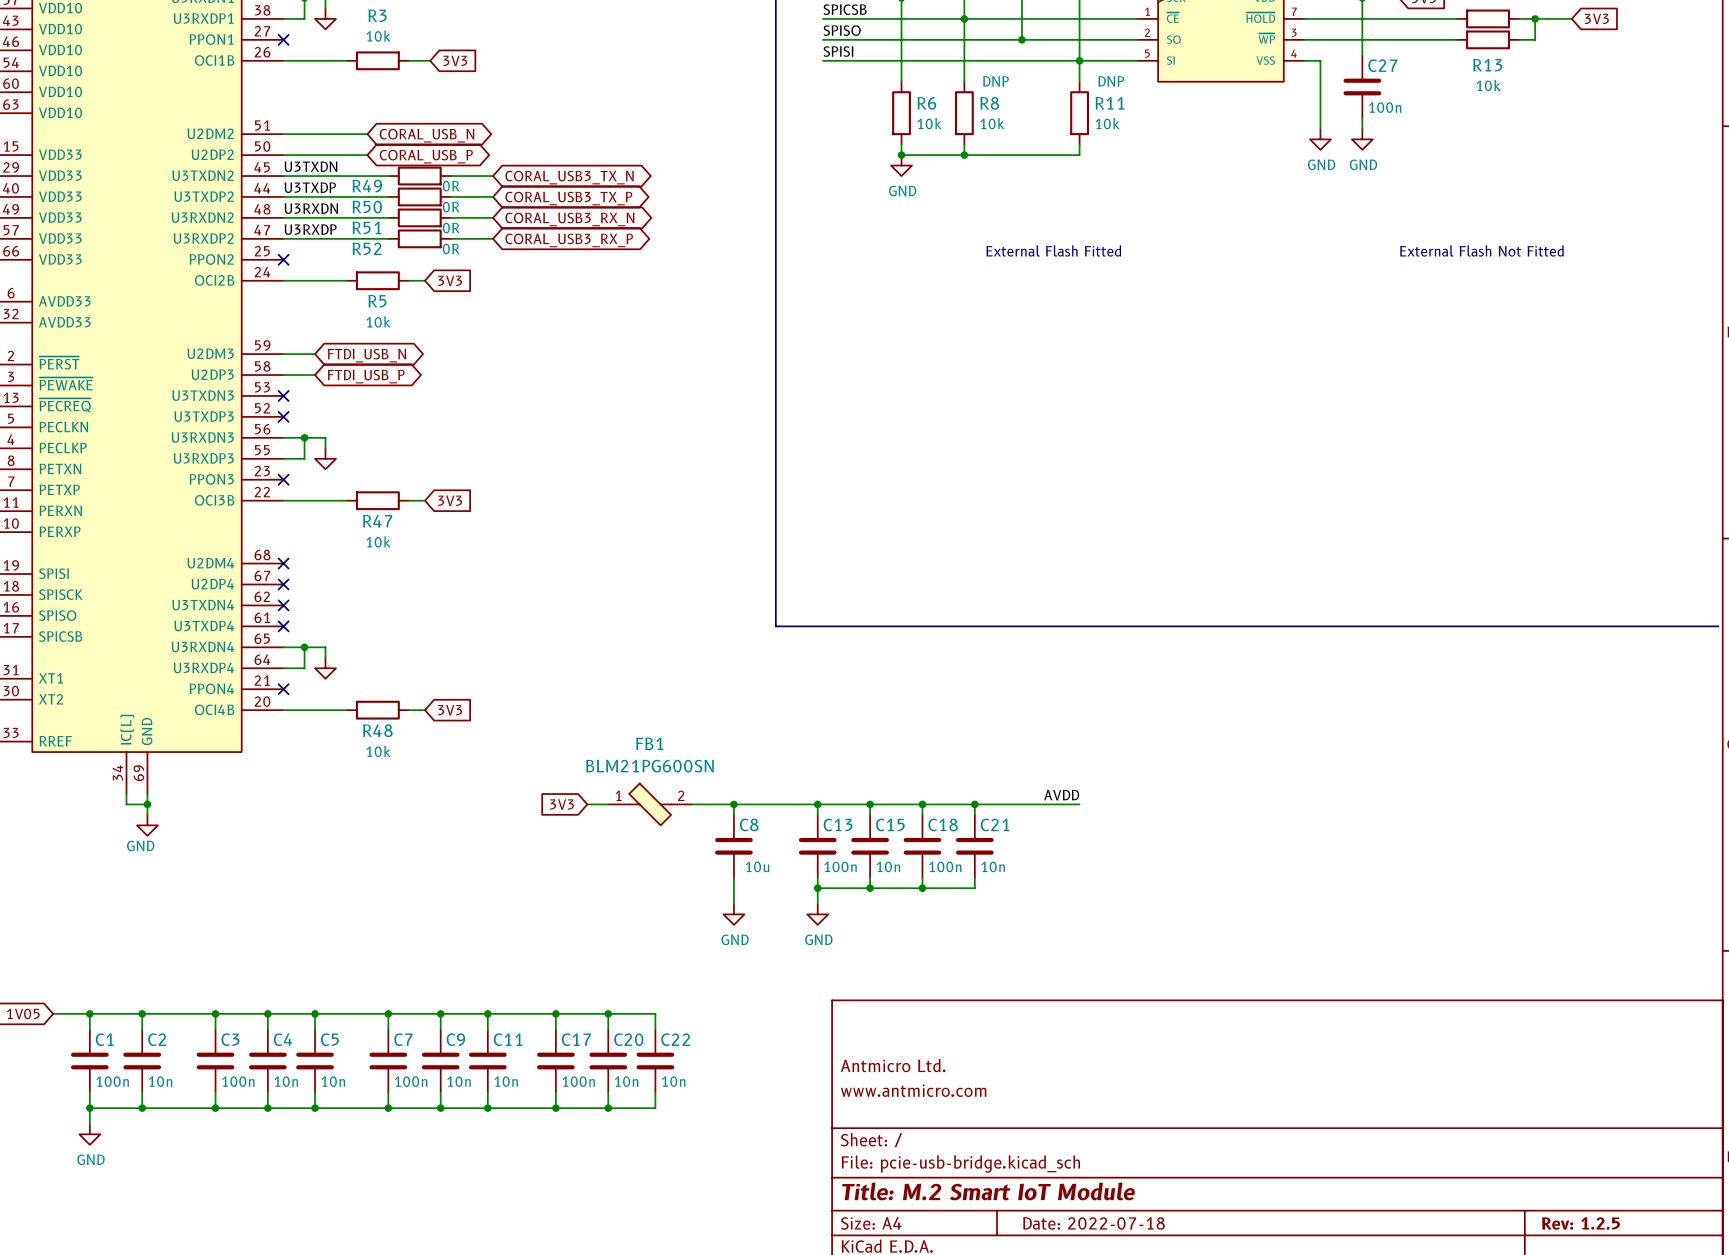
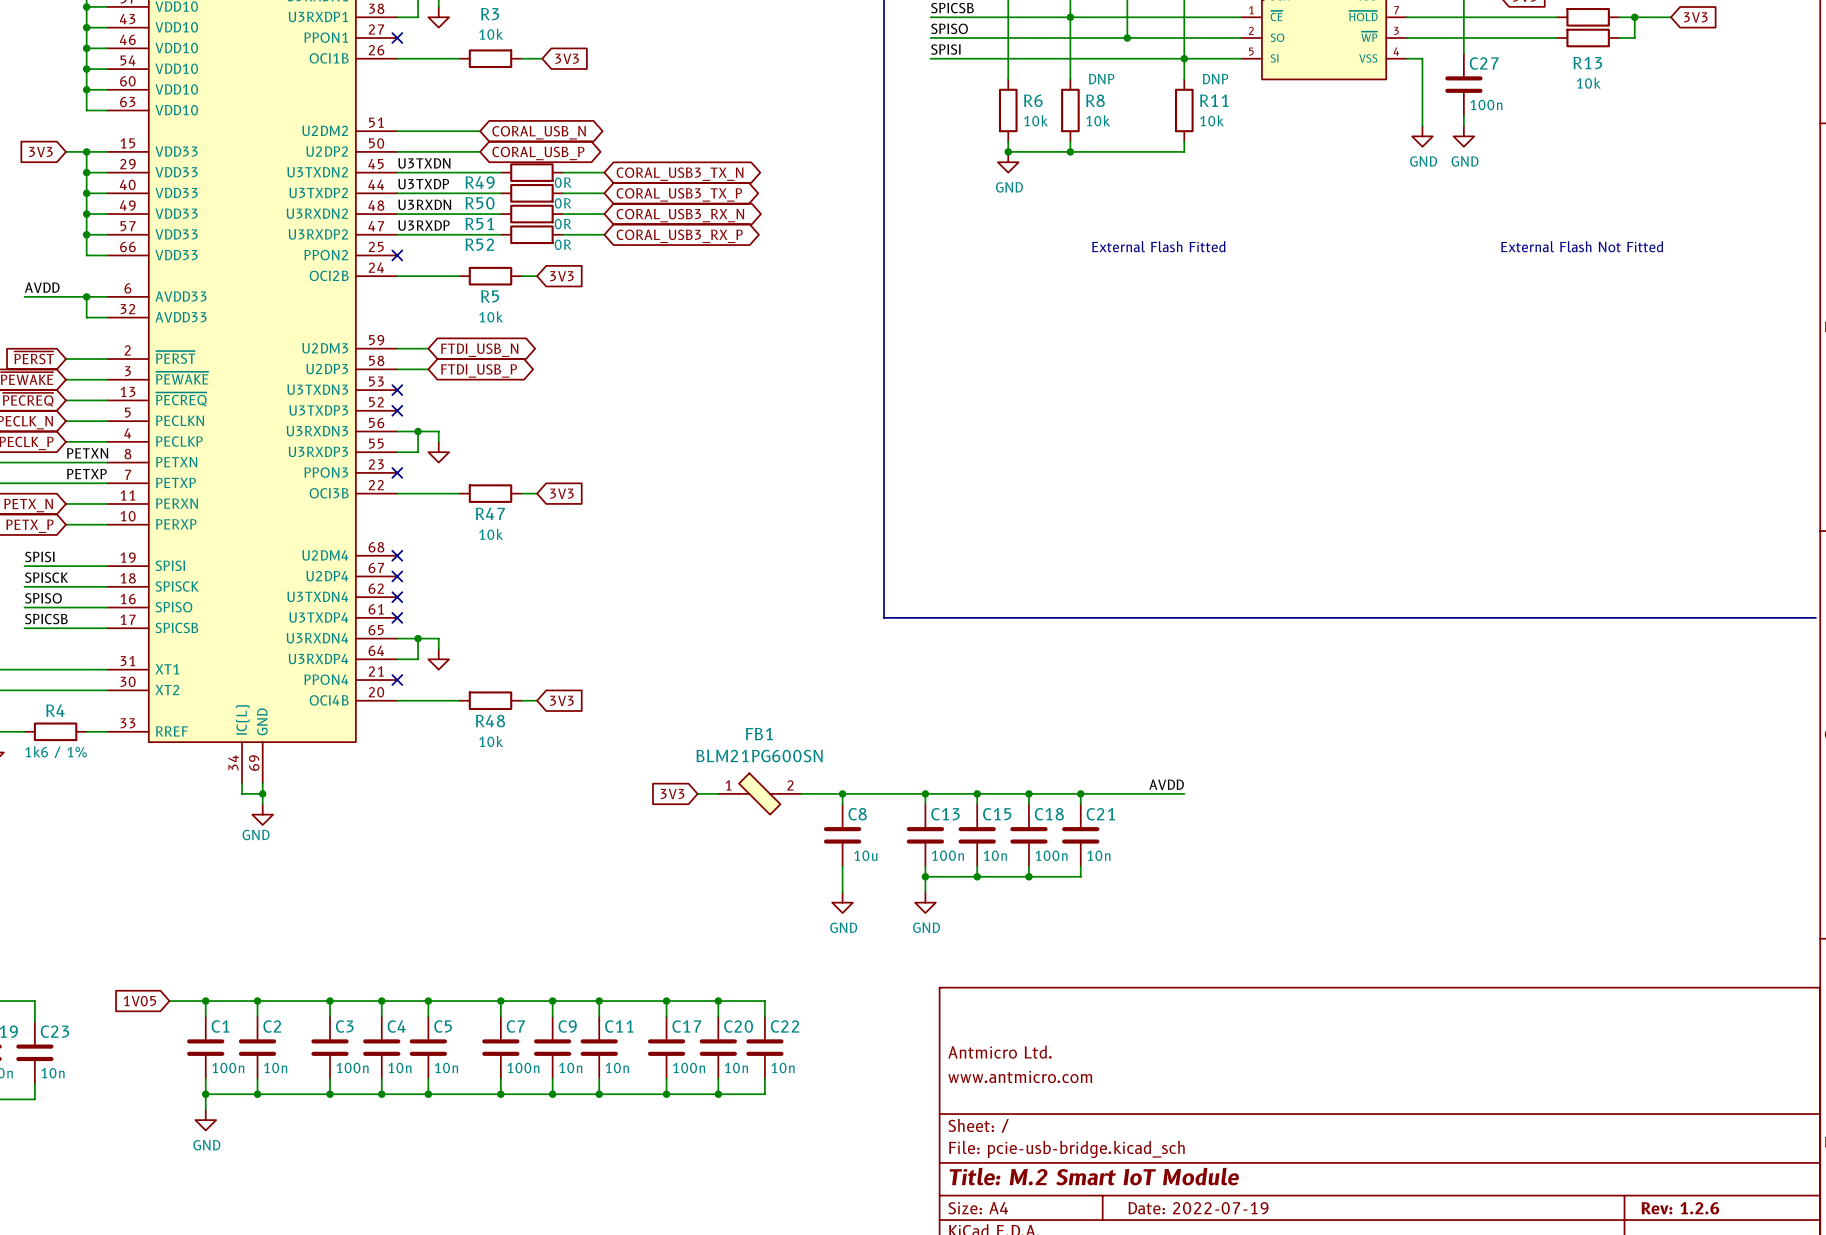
title block: Date: 2022-07-18 (1093, 1223) -> Date: 2022-07-19 (1198, 1208)
title block: Rev: 1.2.5 (1580, 1223) -> Rev: 1.2.6 (1680, 1208)

